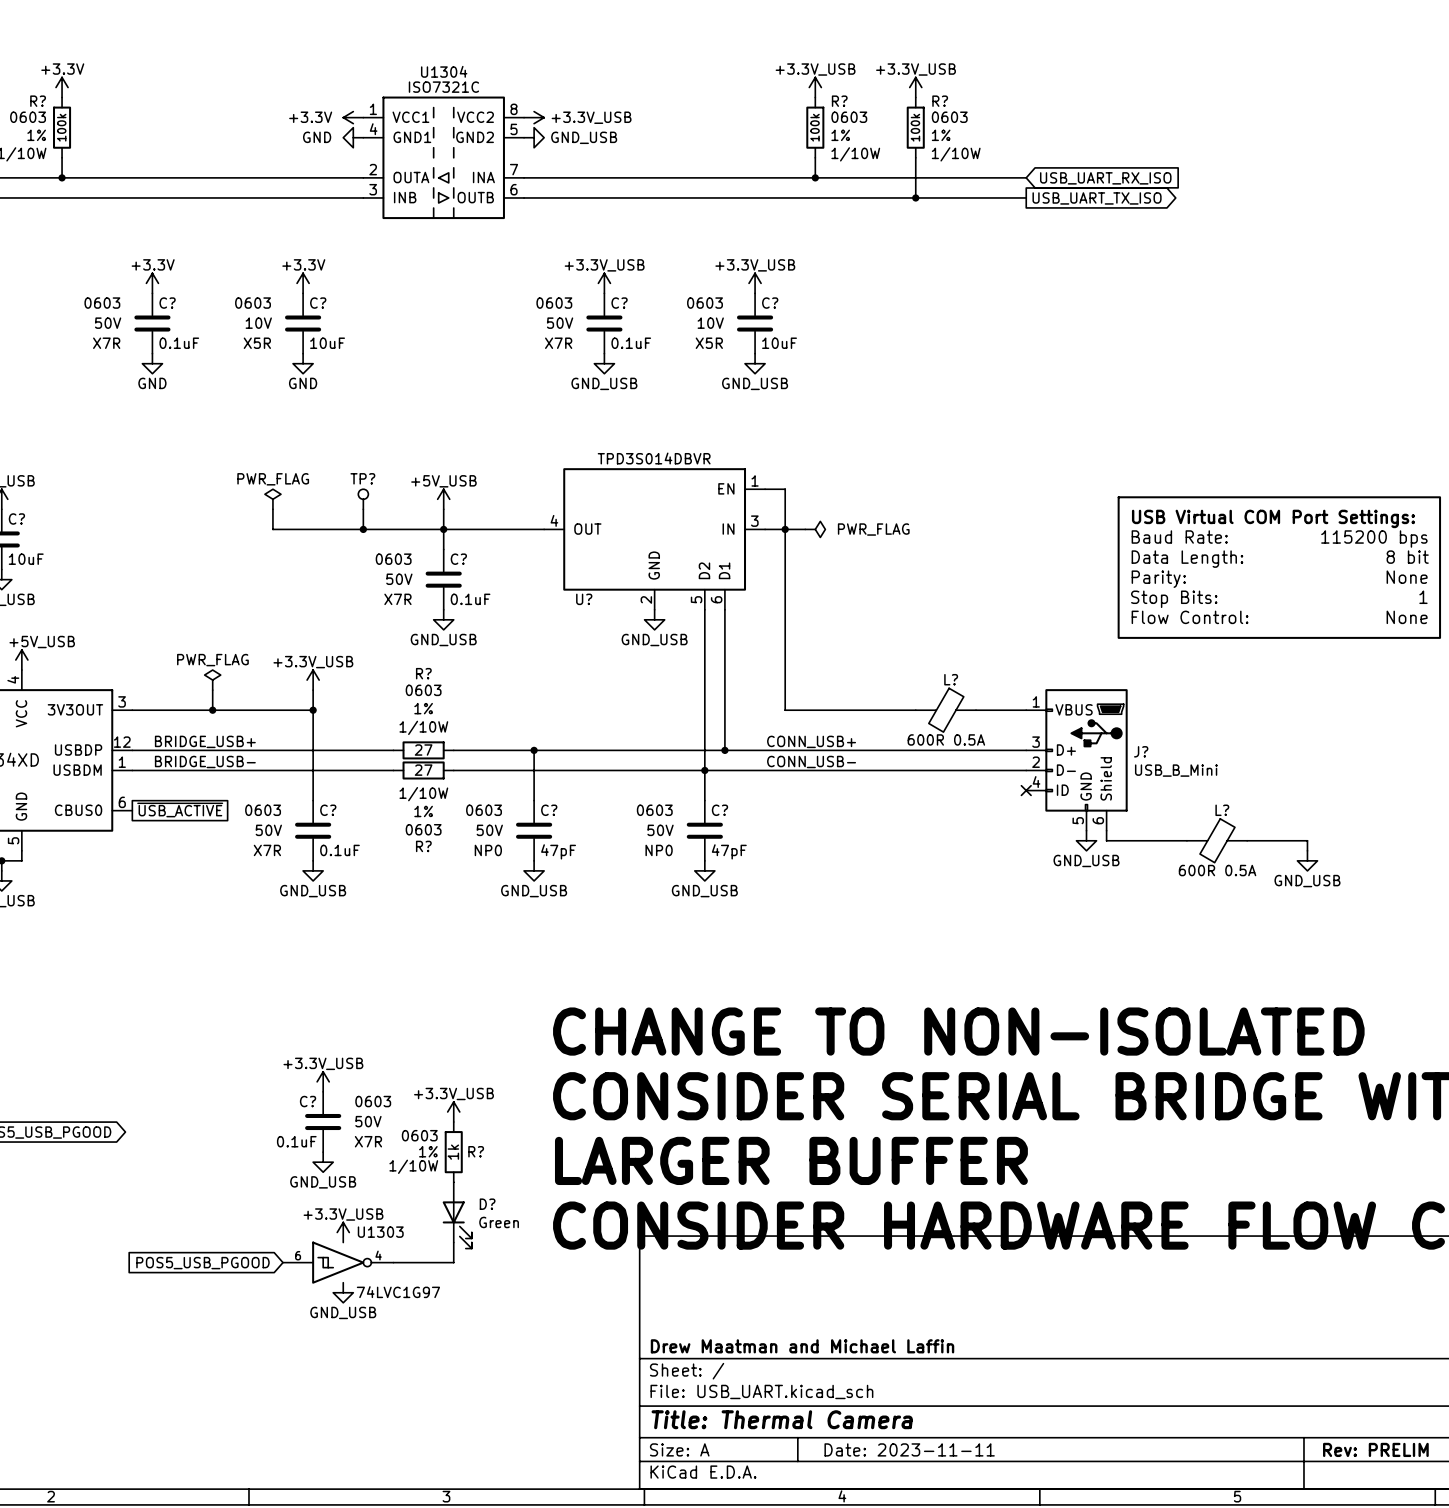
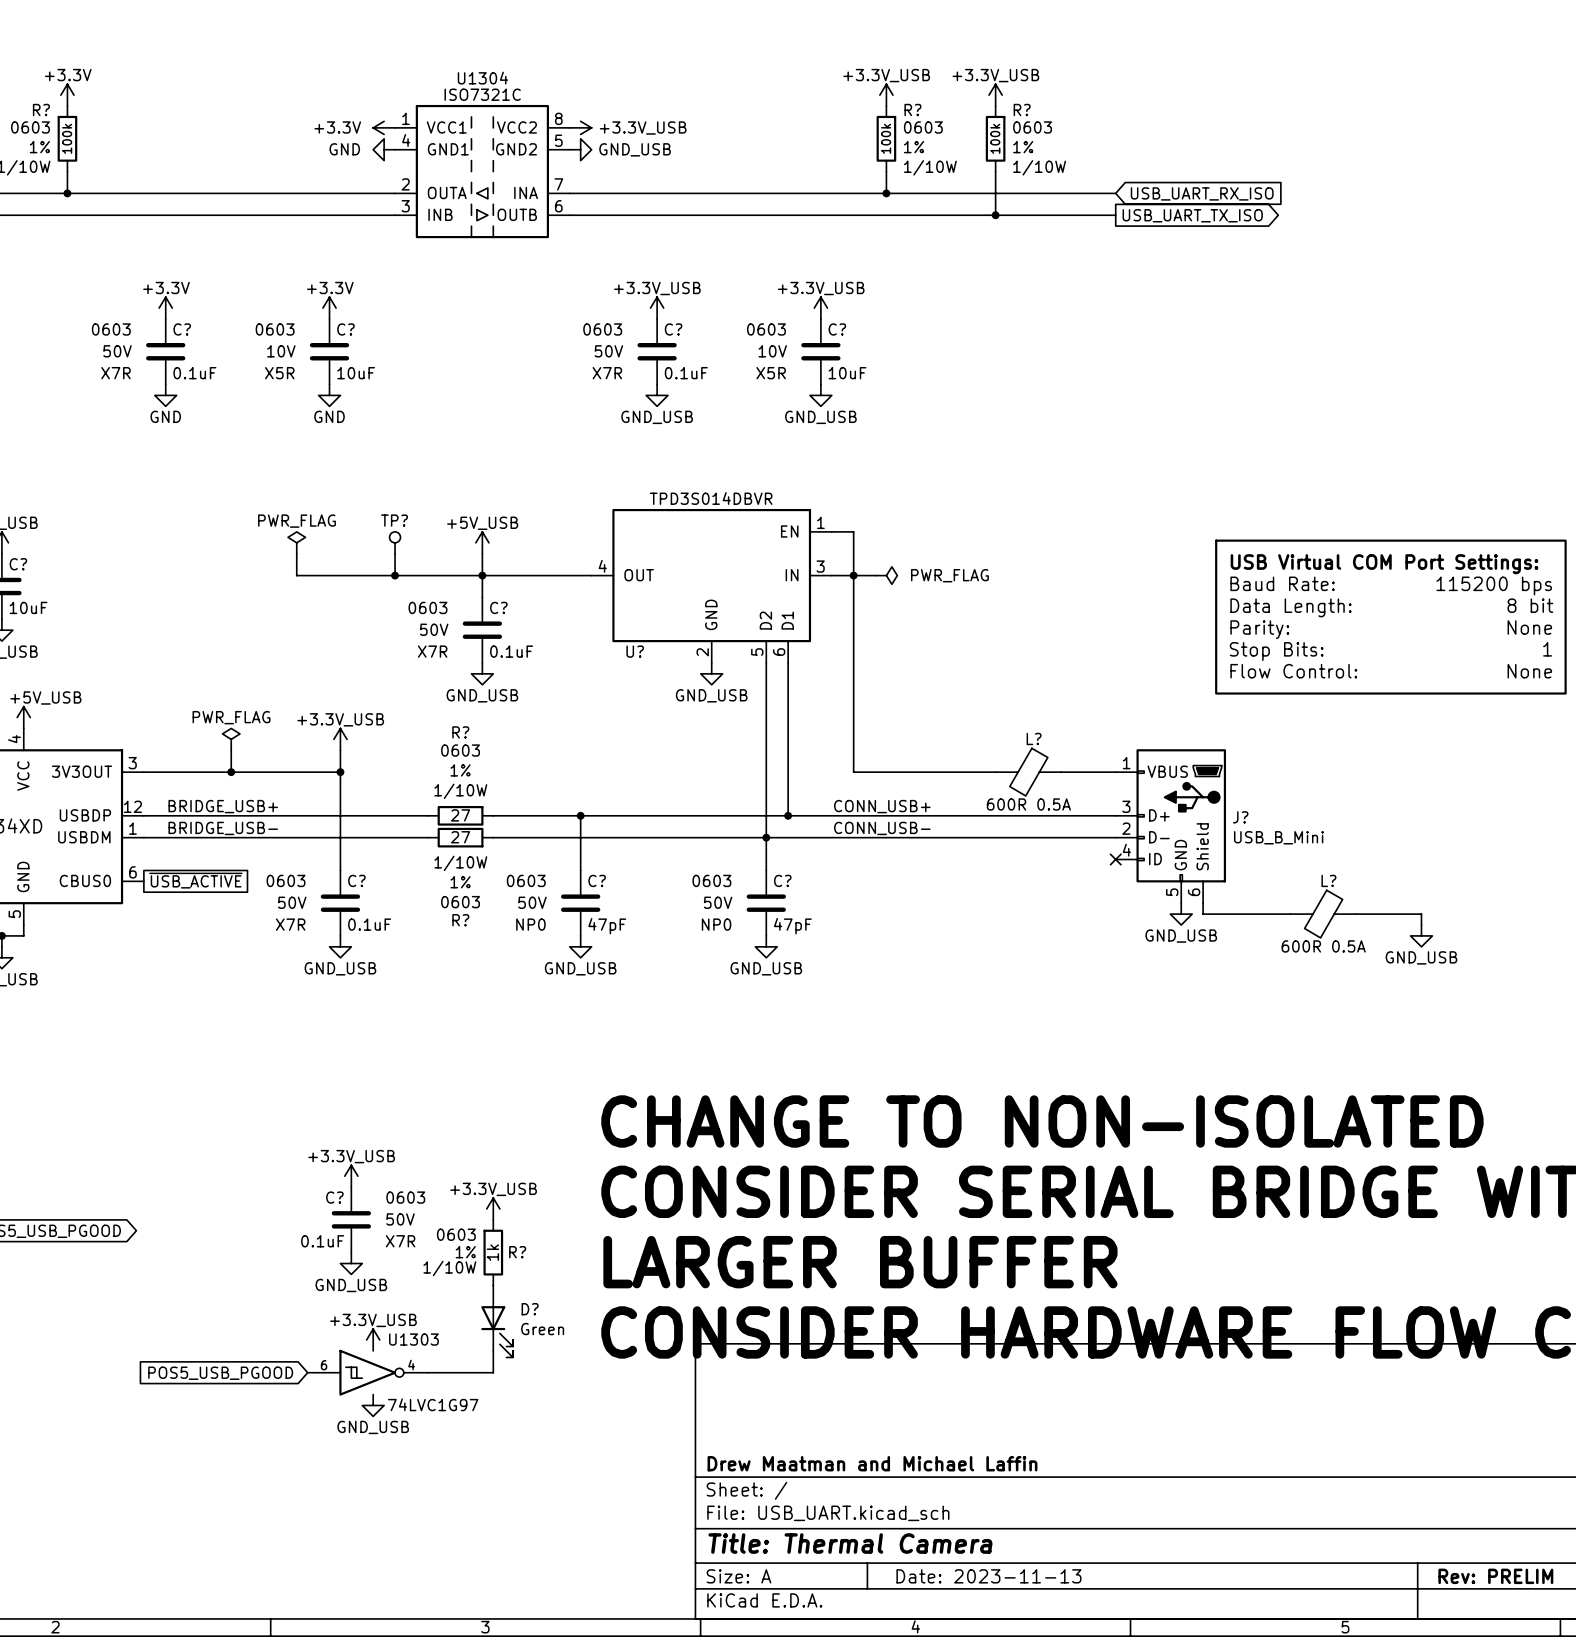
title block: Date: 2023-11-11 (909, 1449) -> Date: 2023-11-13 (988, 1576)

